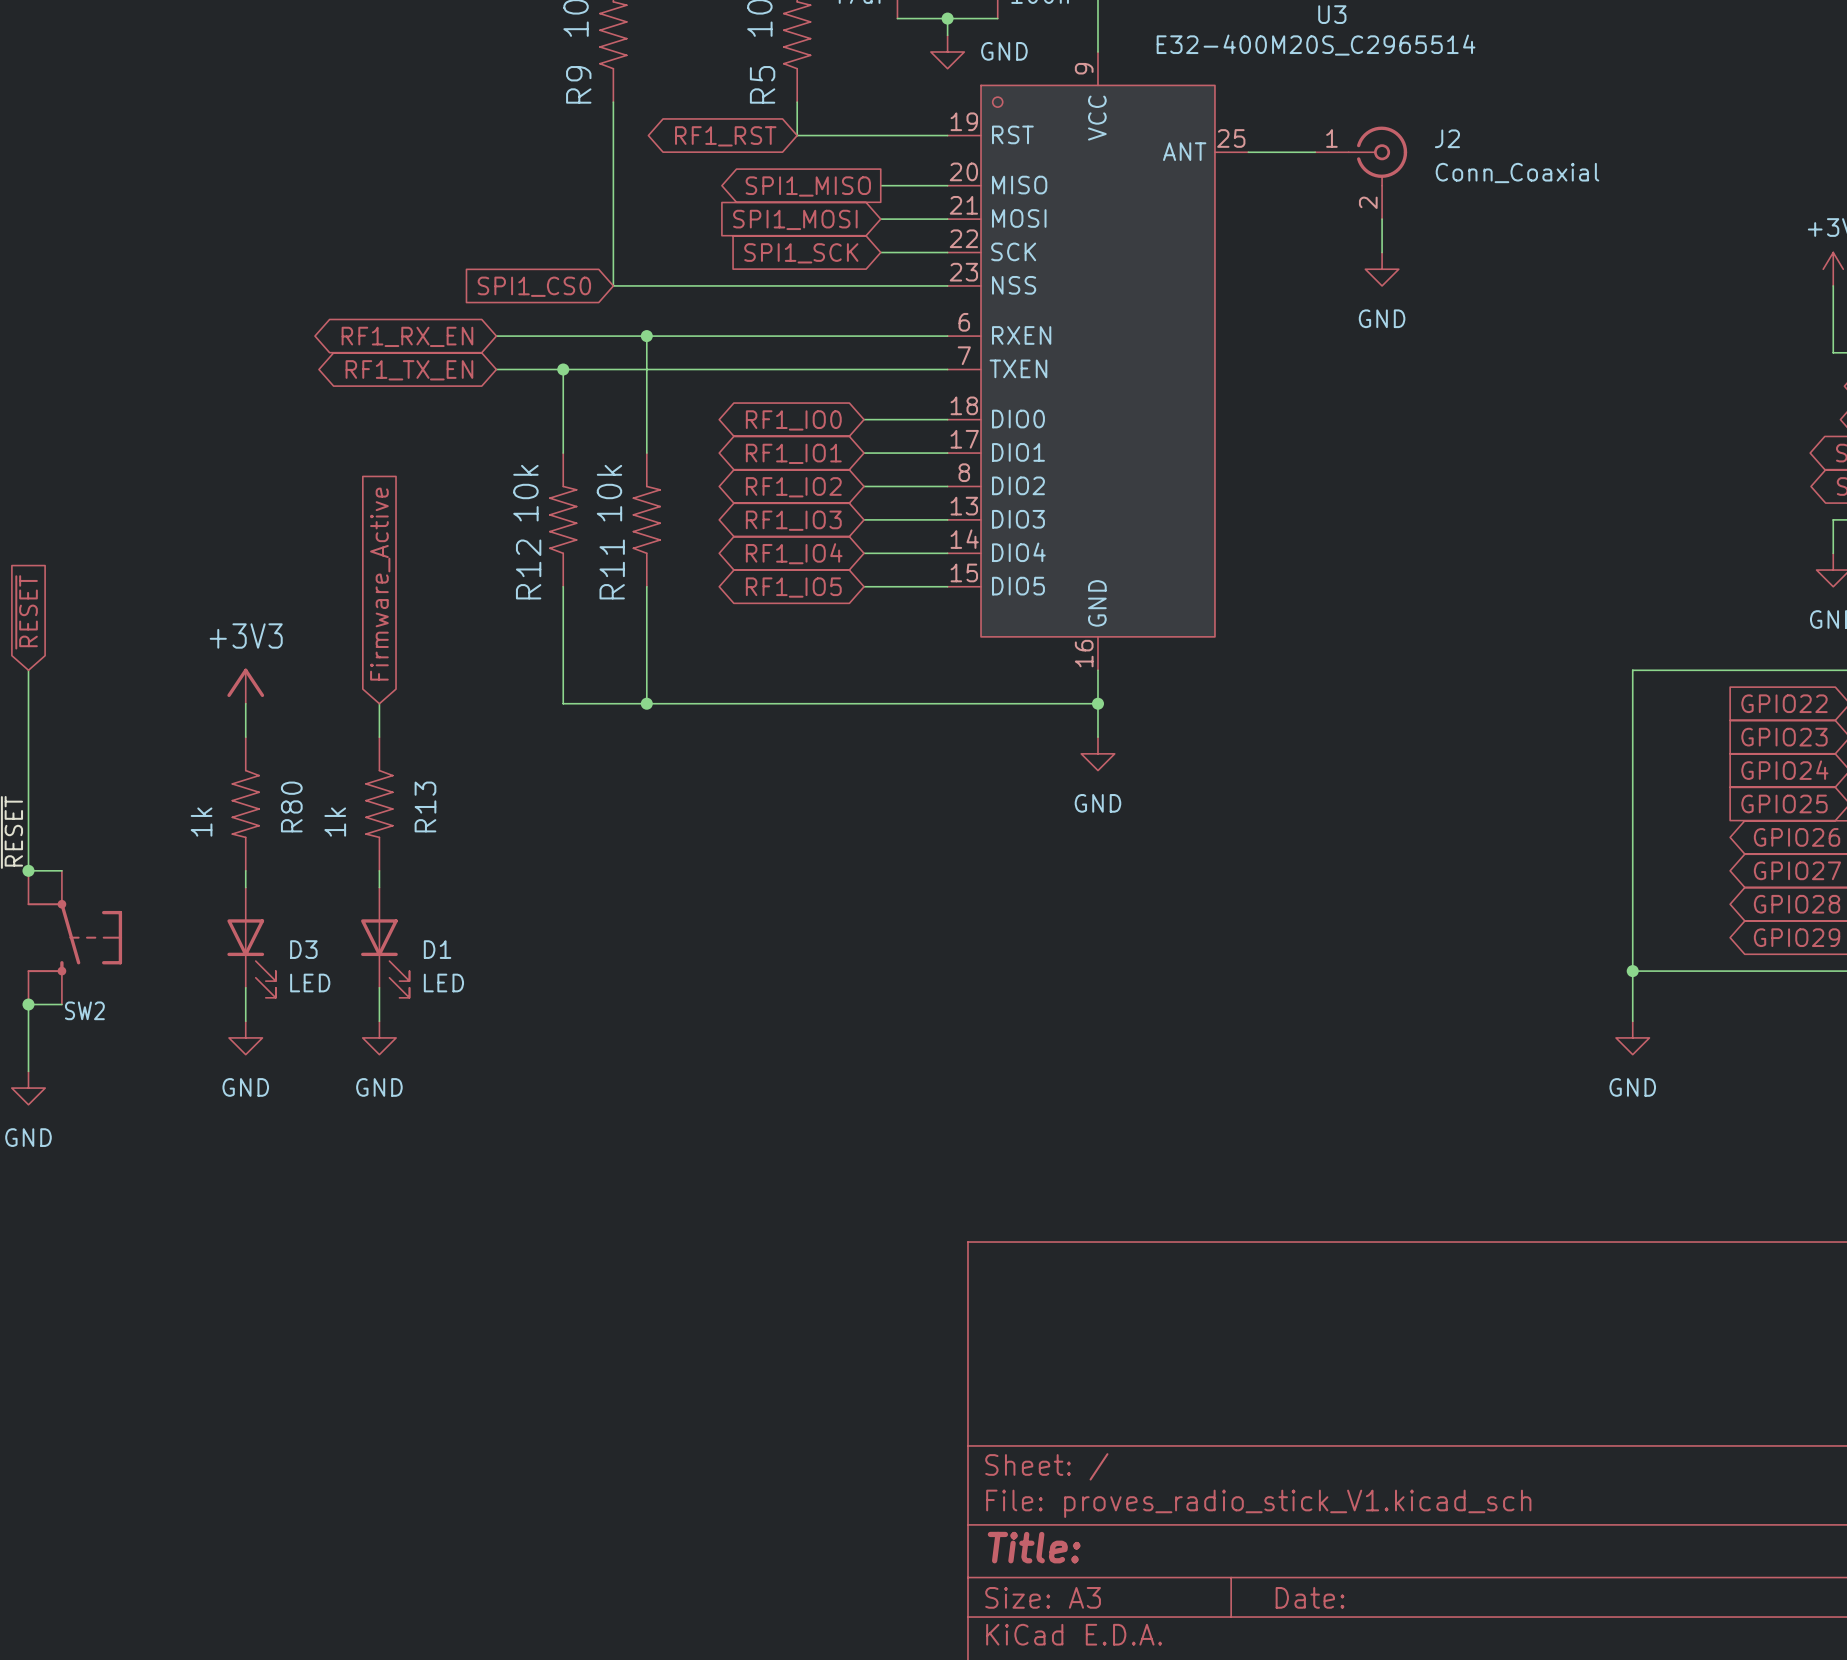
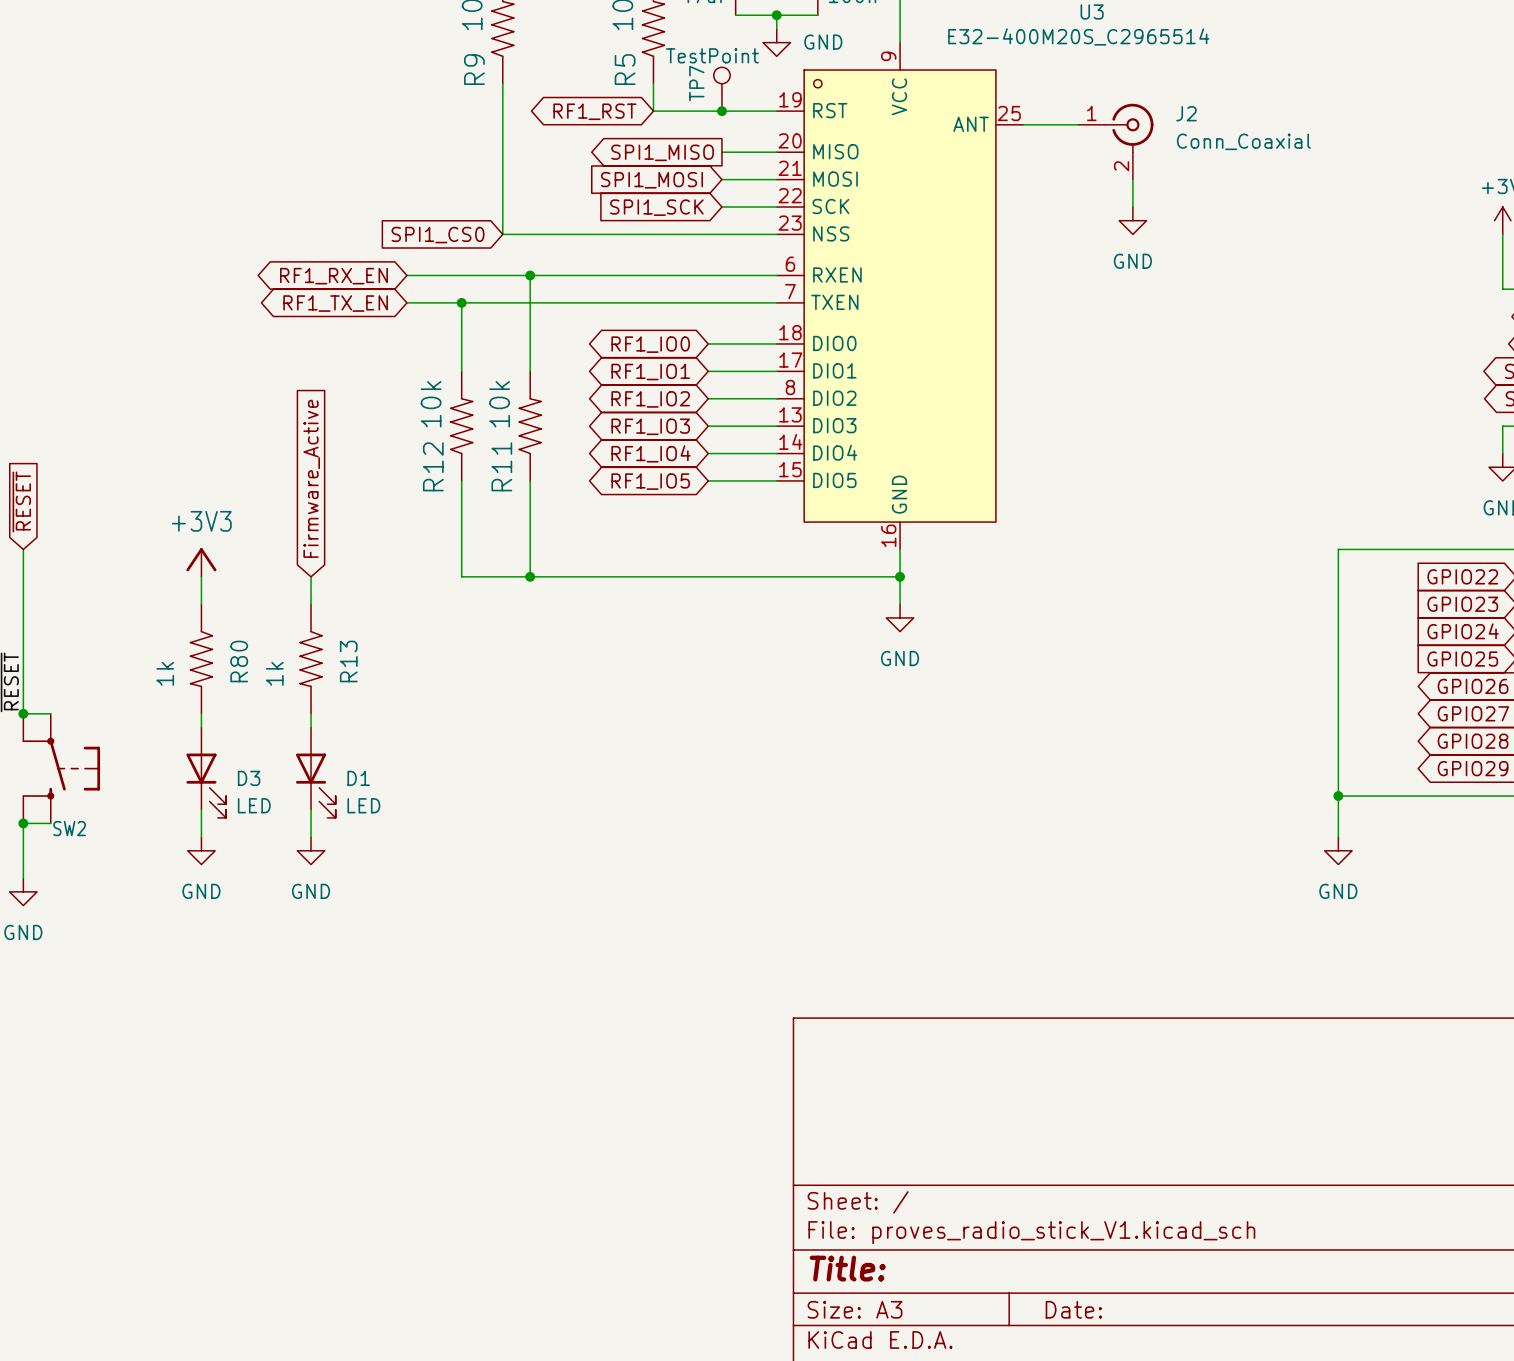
TP7: none -> TestPoint (721, 89)
junction: none -> (721, 111)

